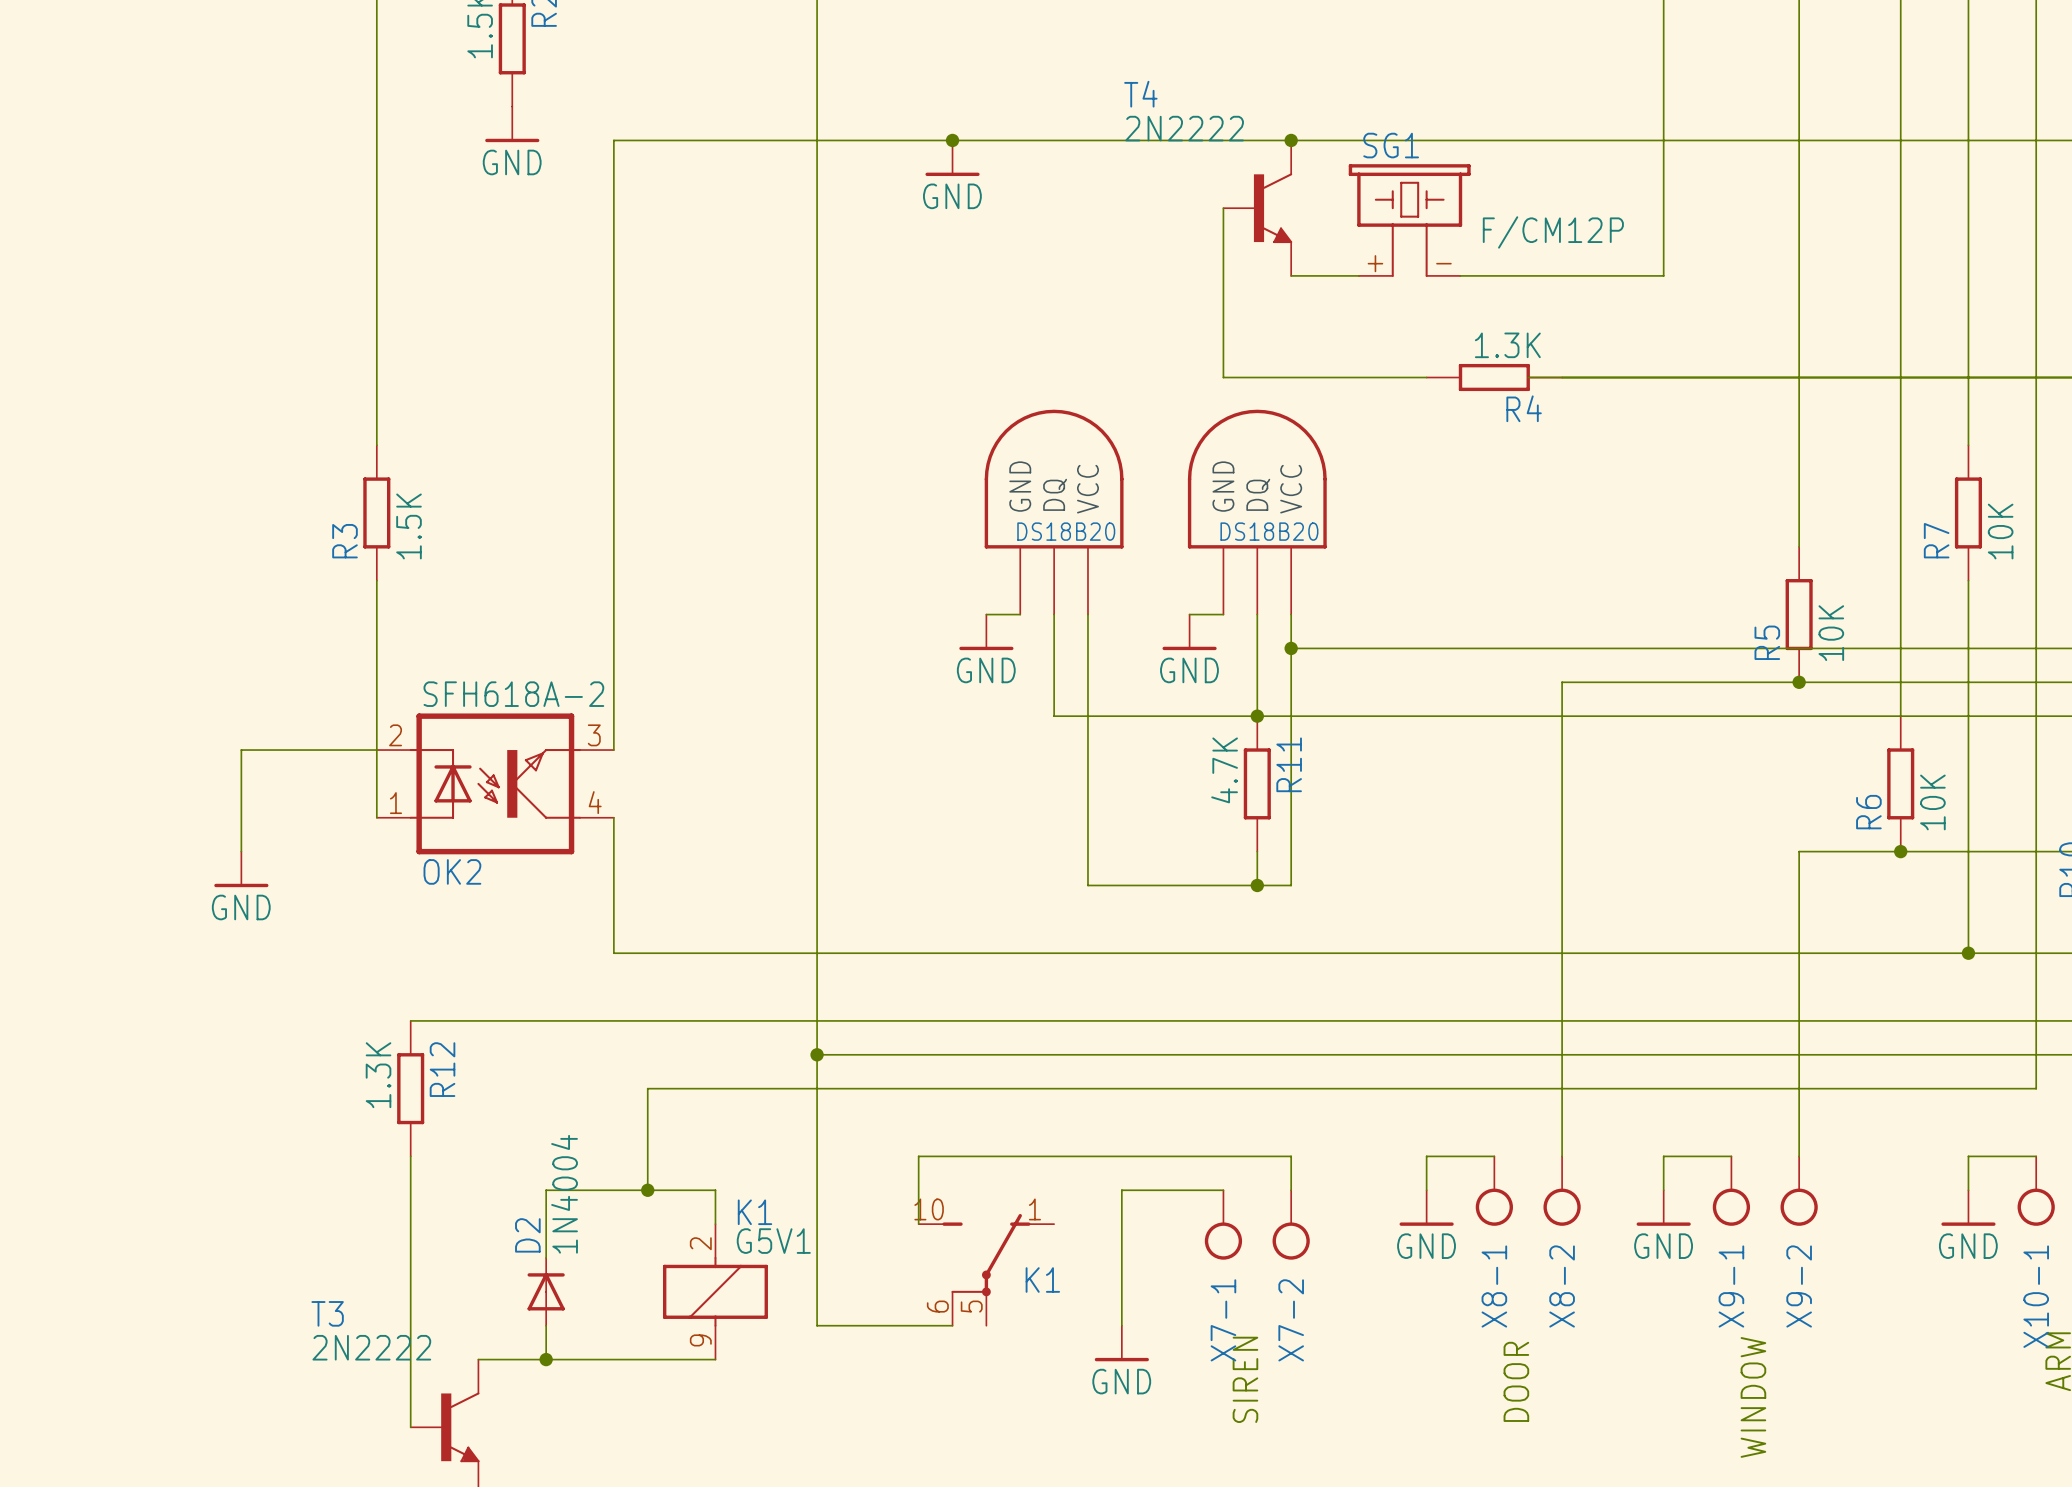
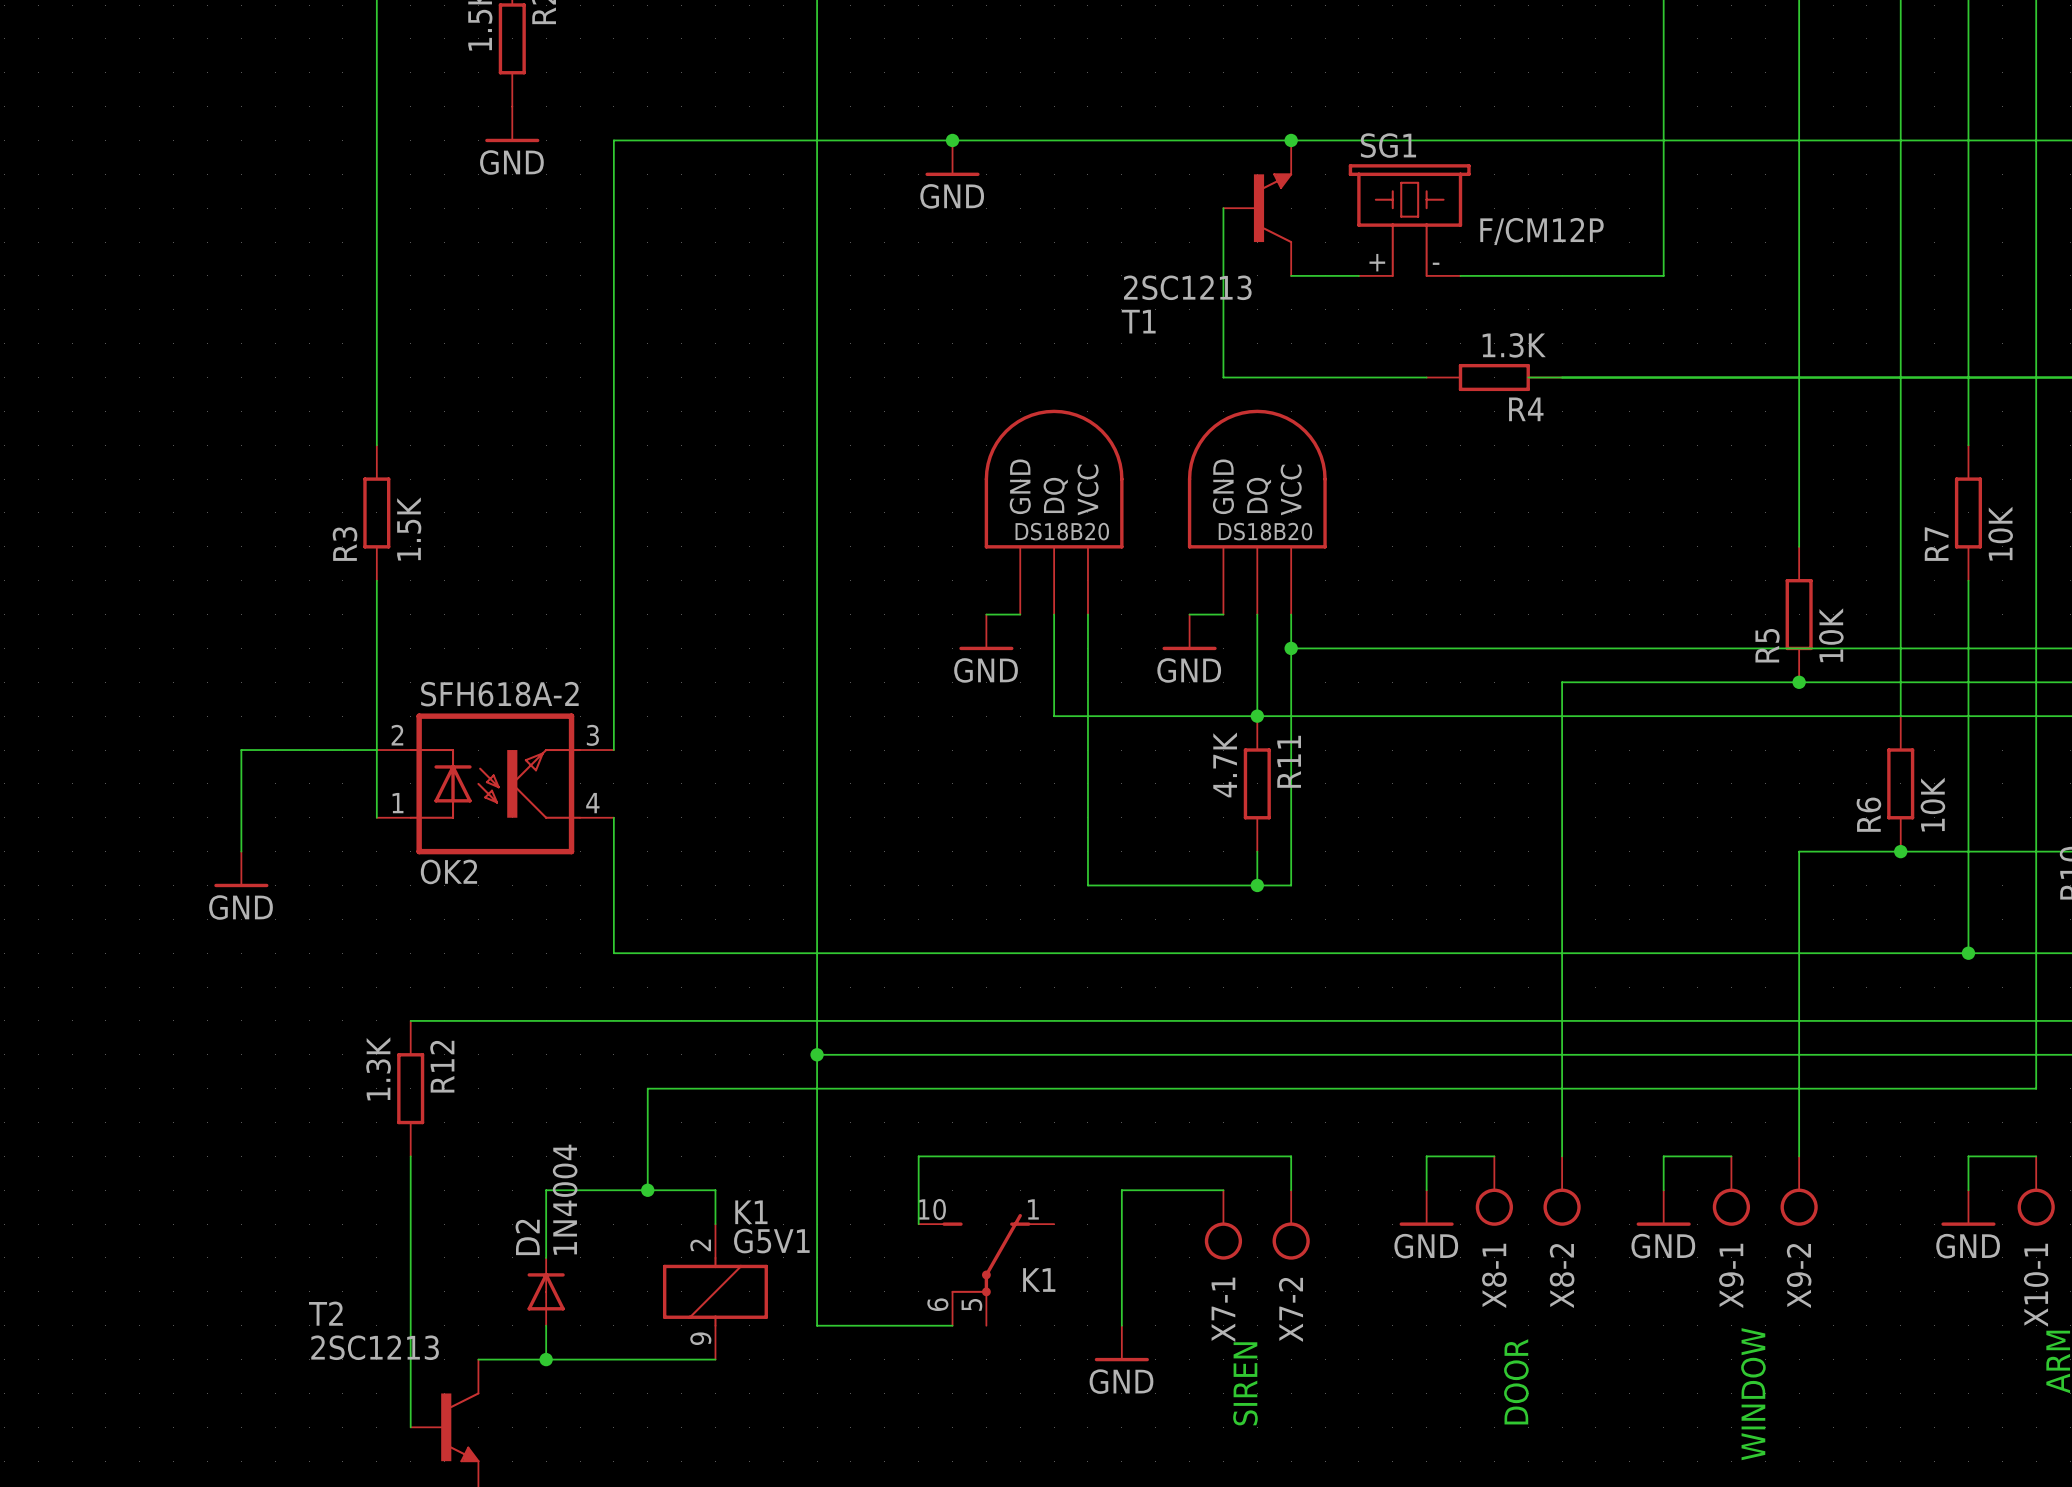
T4: 2N2222 (1257, 208) -> none
T1: none -> 2SC1213 (1257, 208)
T3 name: T3 (327, 1313) -> T2 (325, 1313)
T3 value: 2N2222 (371, 1347) -> 2SC1213 (375, 1347)

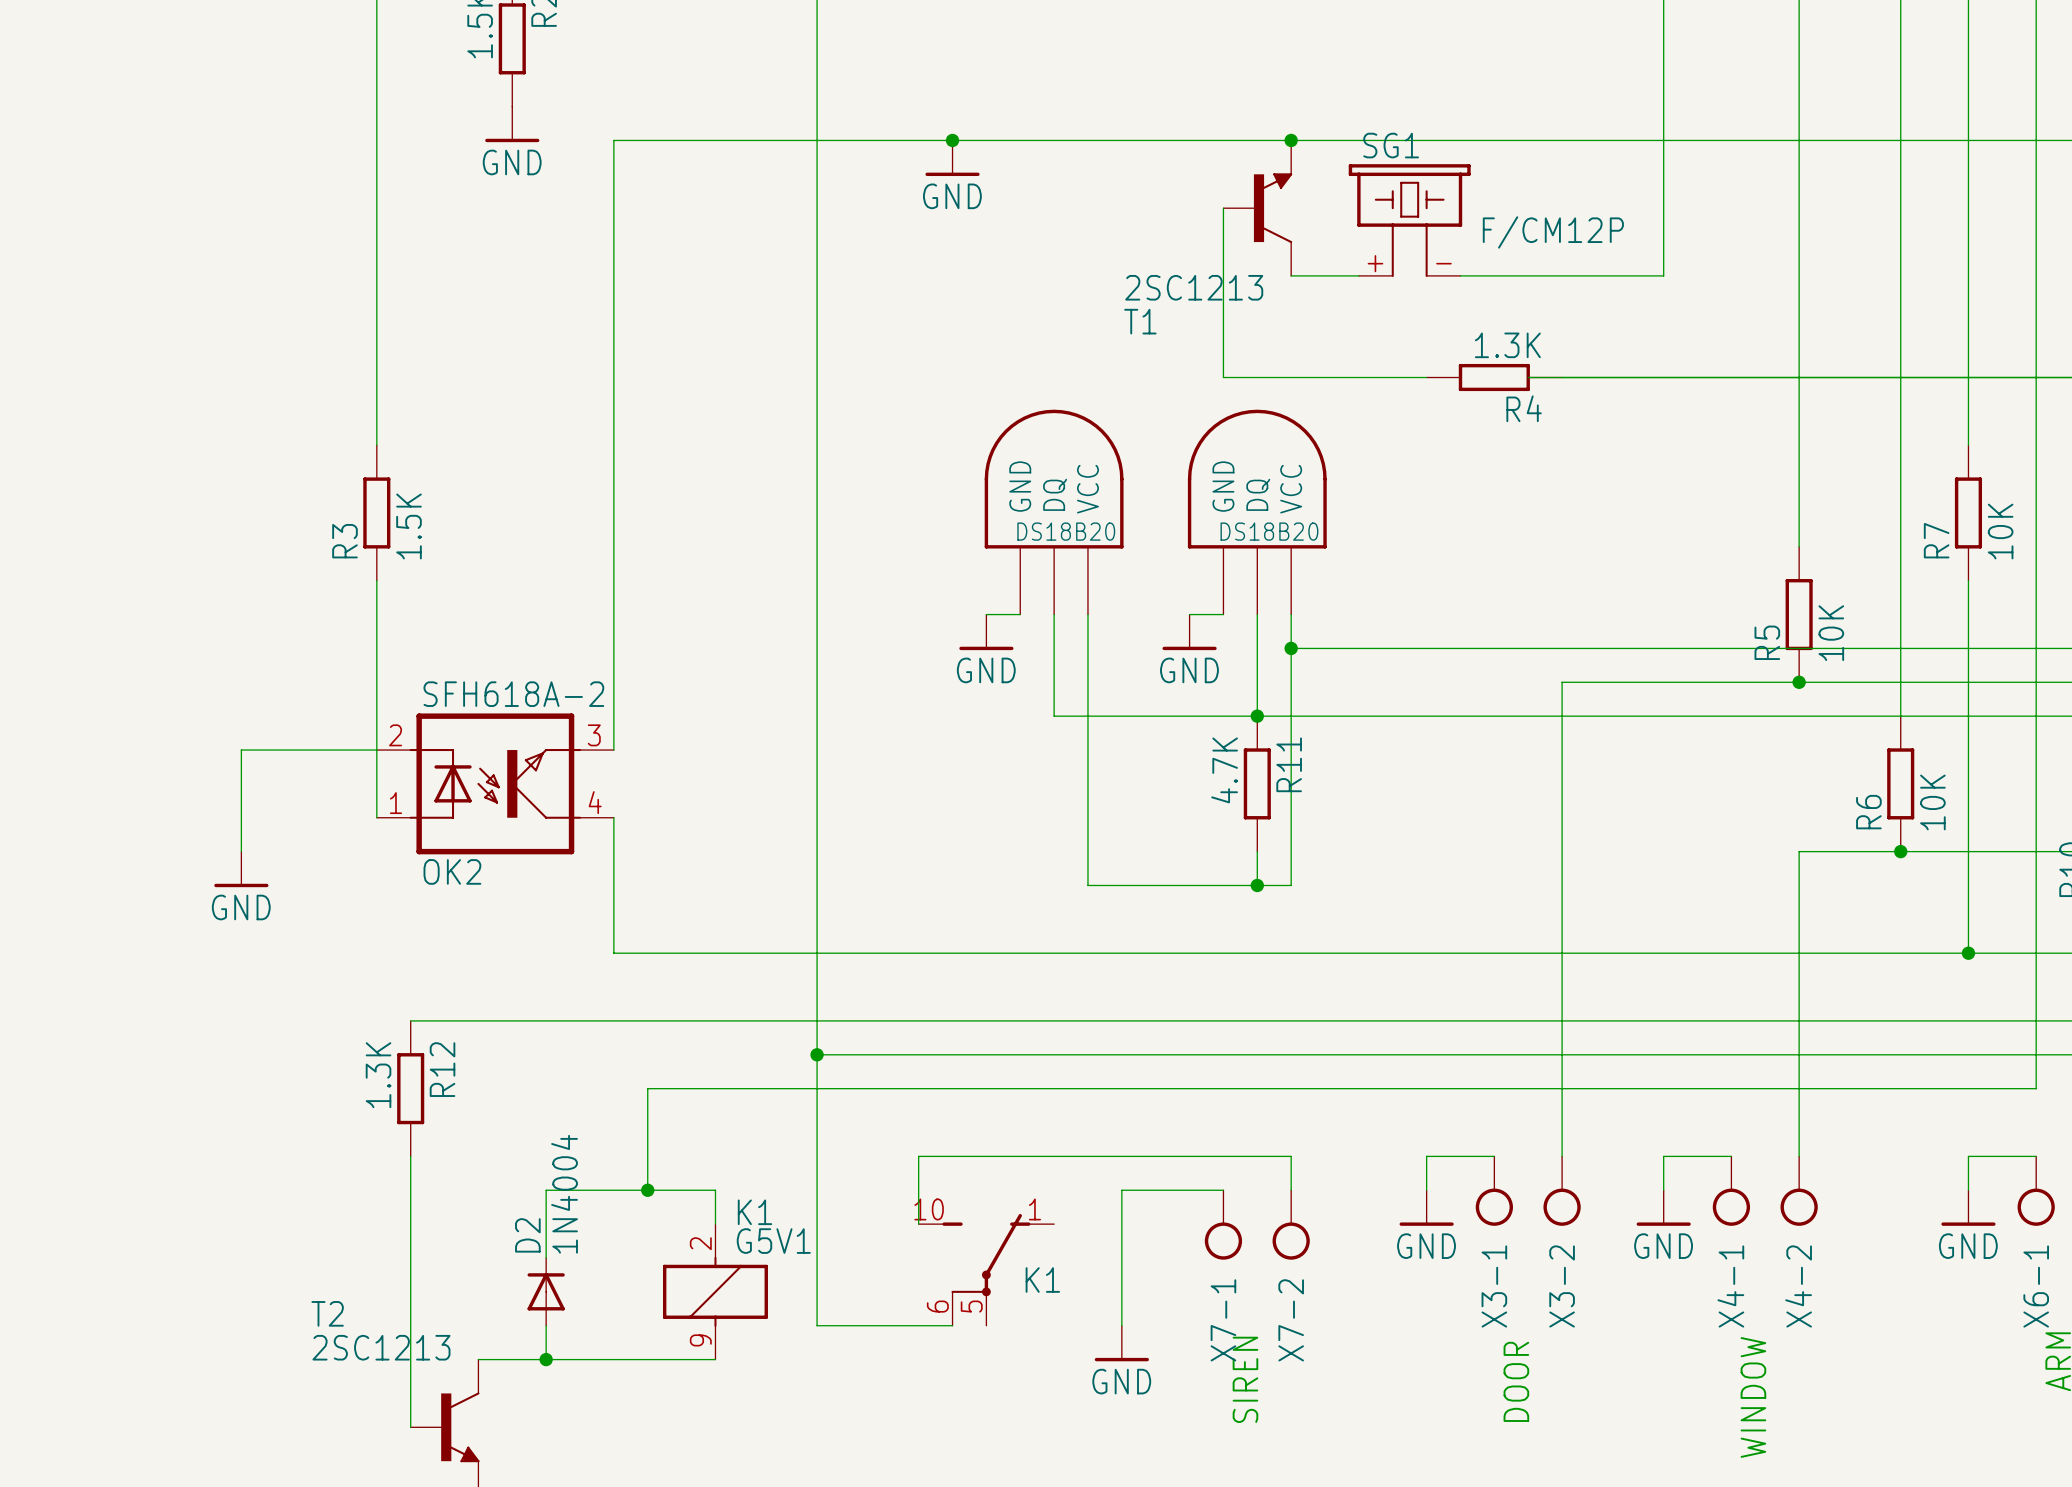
X8-1 name: X8-1 (1494, 1275) -> X3-1 (1494, 1286)
X9-1 name: X9-1 (1731, 1275) -> X4-1 (1730, 1286)
X8-2 name: X8-2 (1562, 1276) -> X3-2 (1562, 1286)
X9-2 name: X9-2 (1799, 1276) -> X4-2 (1798, 1286)
X10-1 name: X10-1 (2036, 1285) -> X6-1 (2036, 1286)

